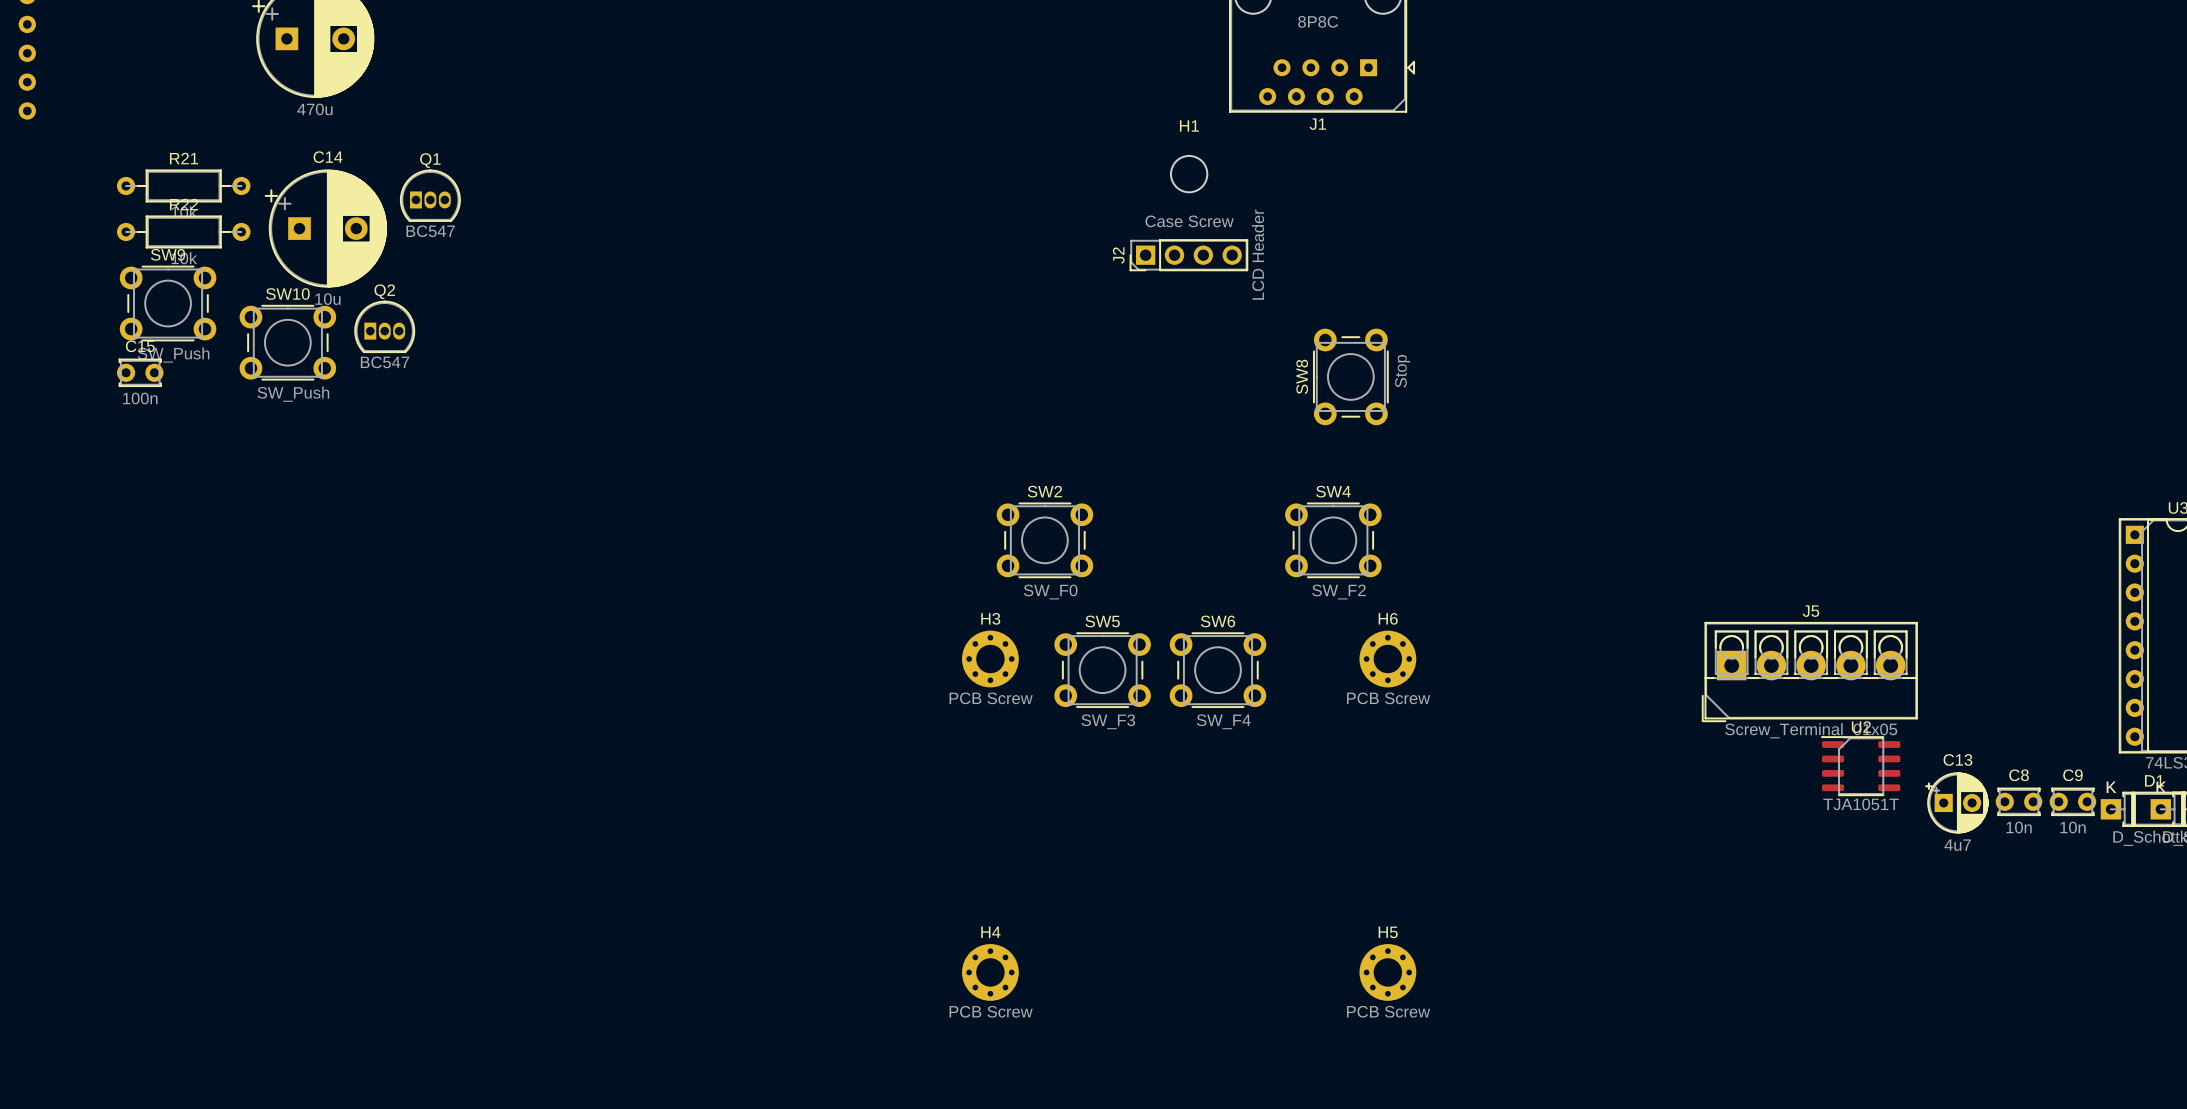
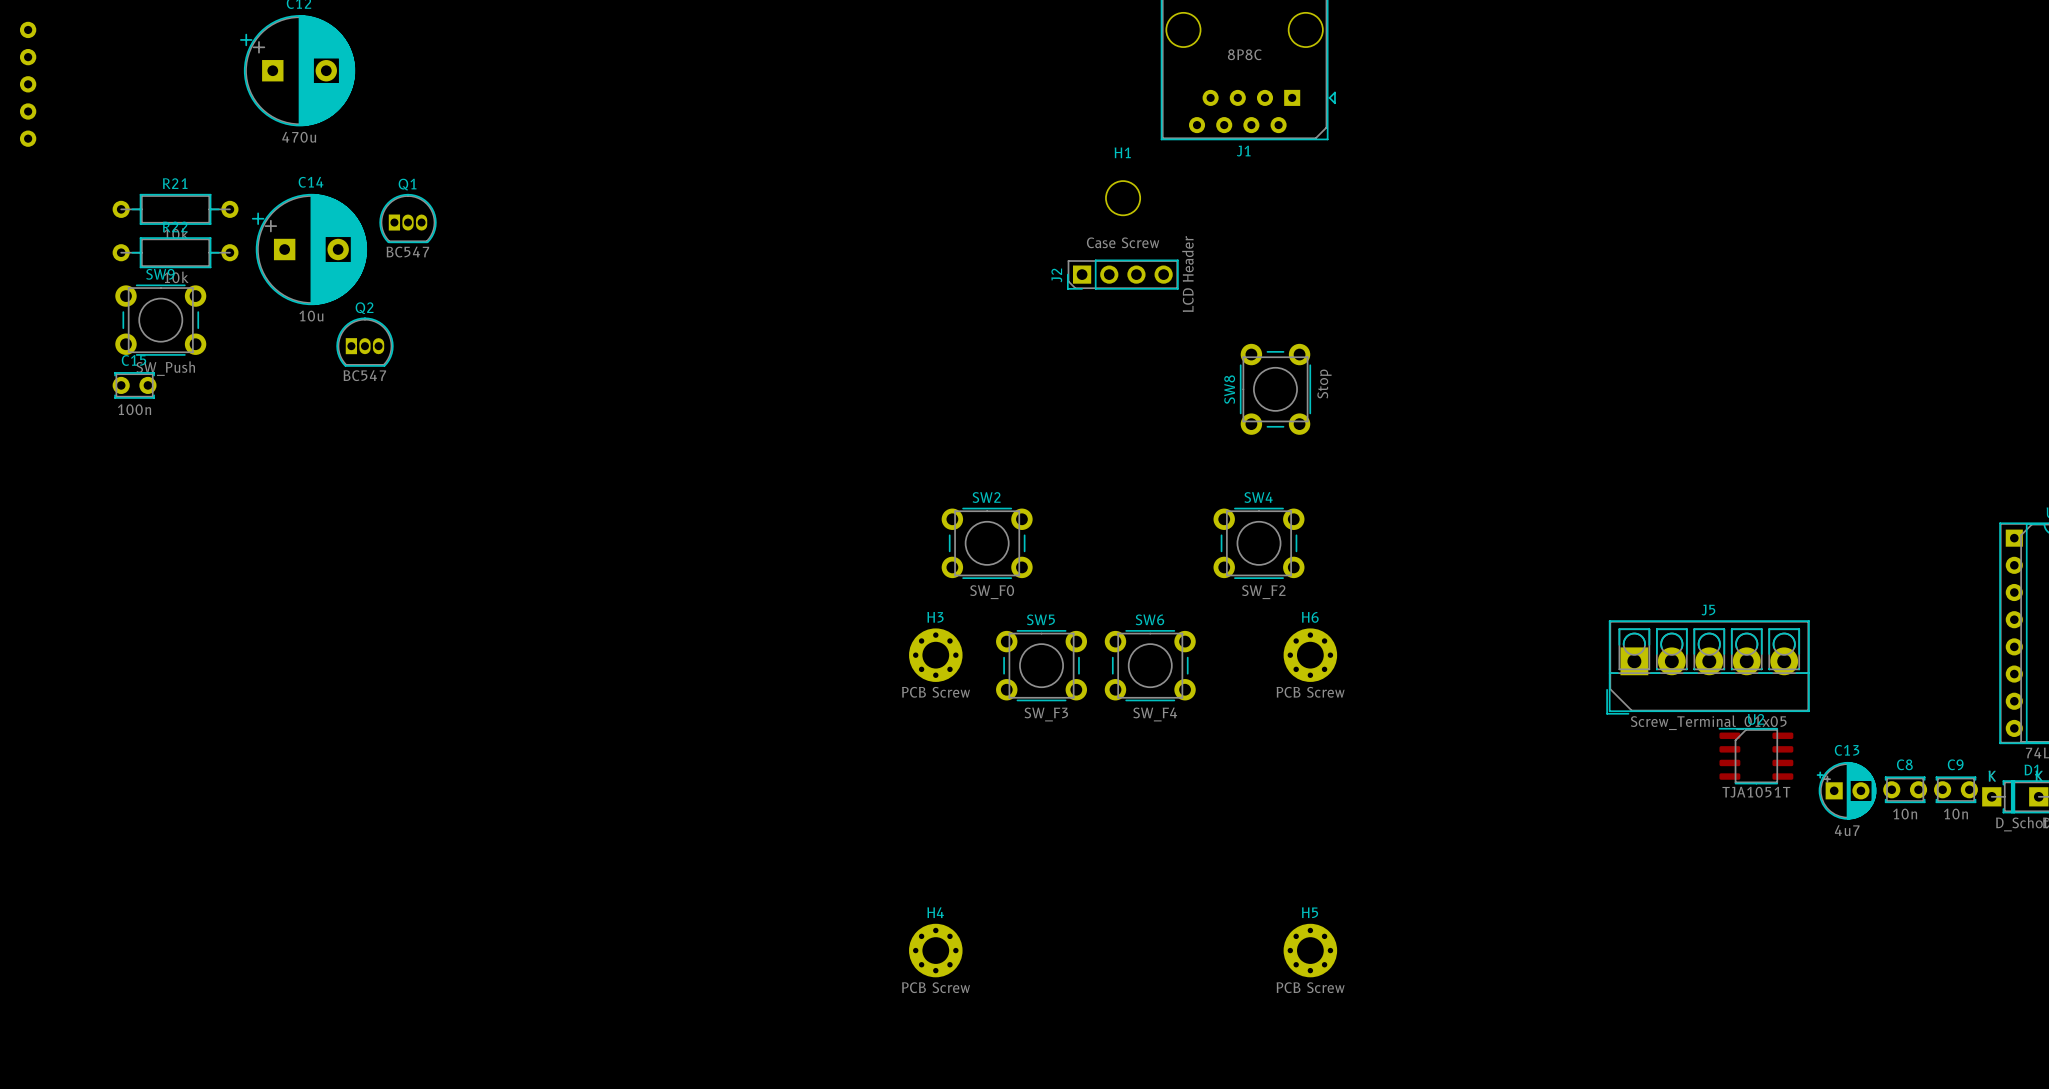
SW10: SW_Push (287, 342) -> none

